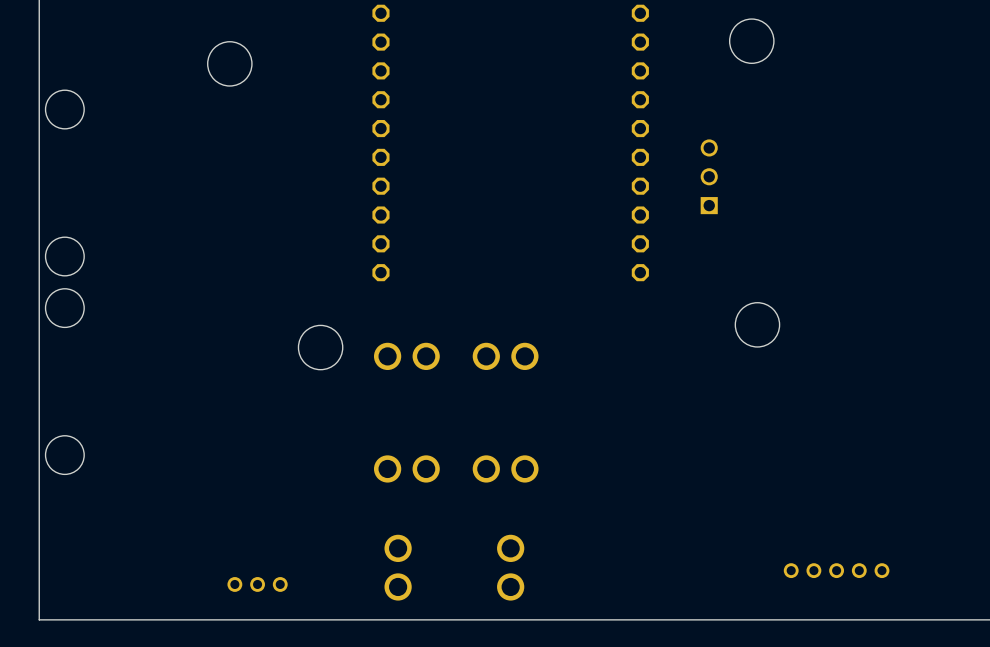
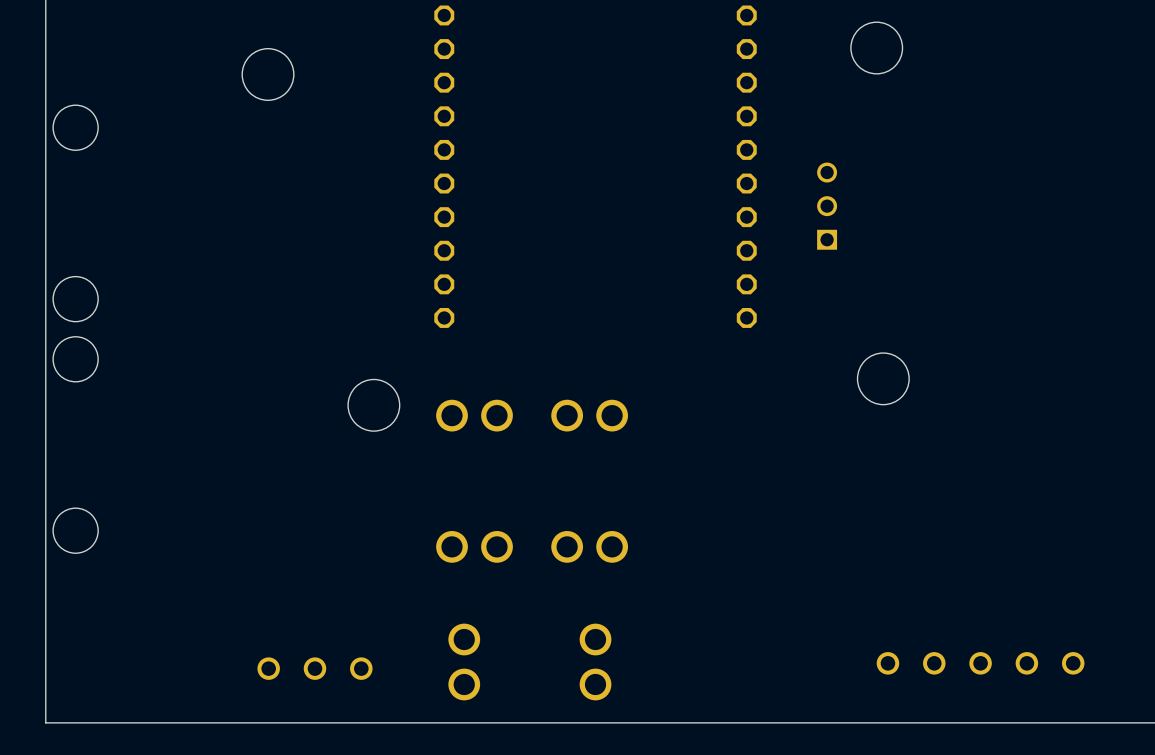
part footprint: [783, 563, 890, 579] -> [876, 652, 1085, 675]
part: none -> (314, 668)
part: (257, 584) -> none

